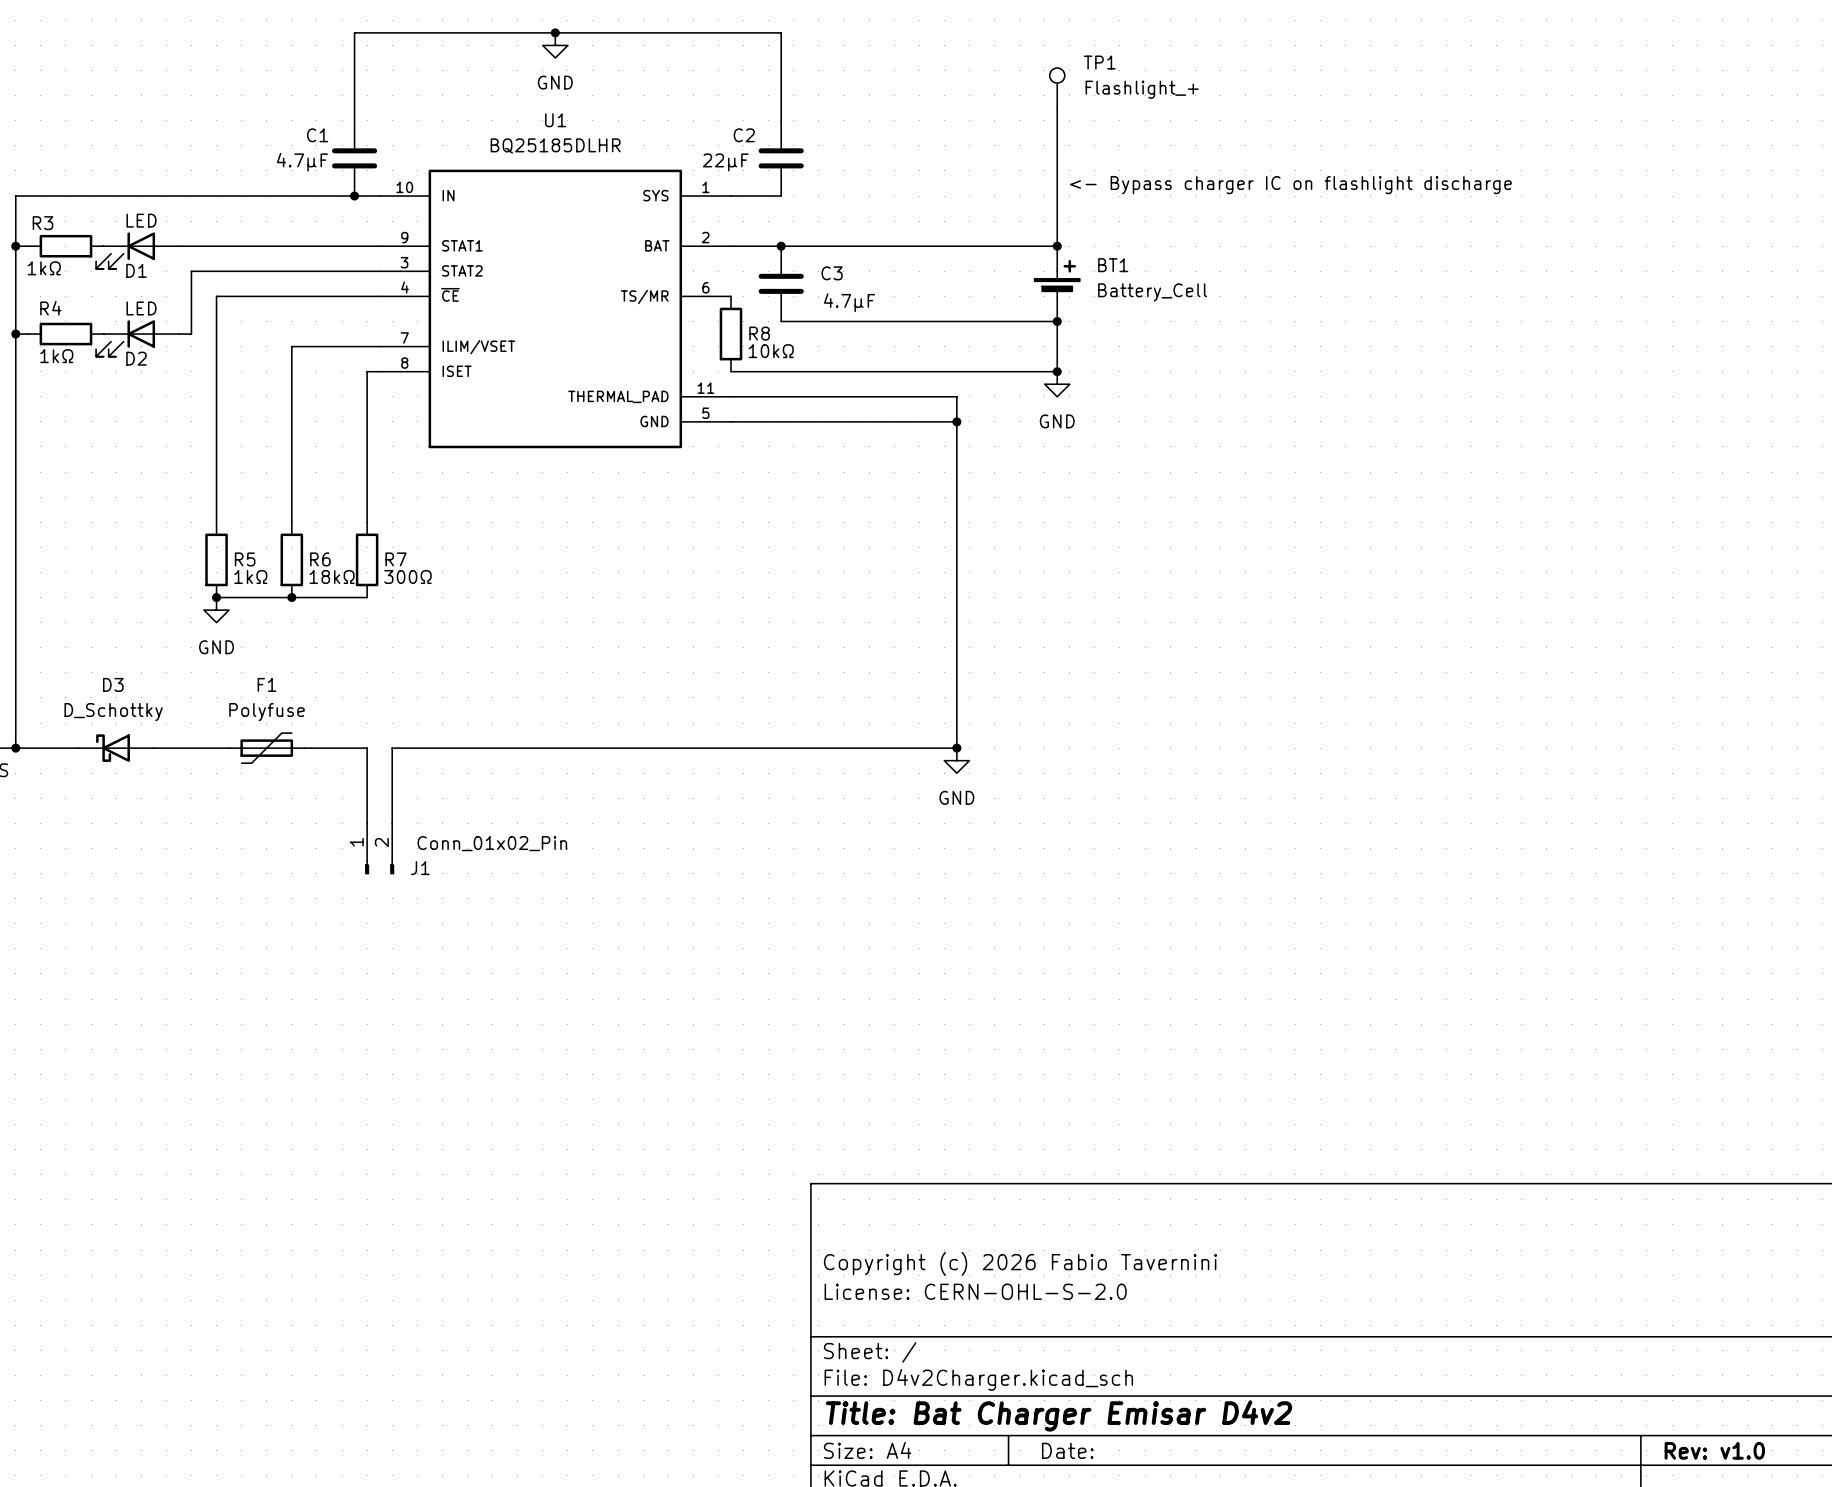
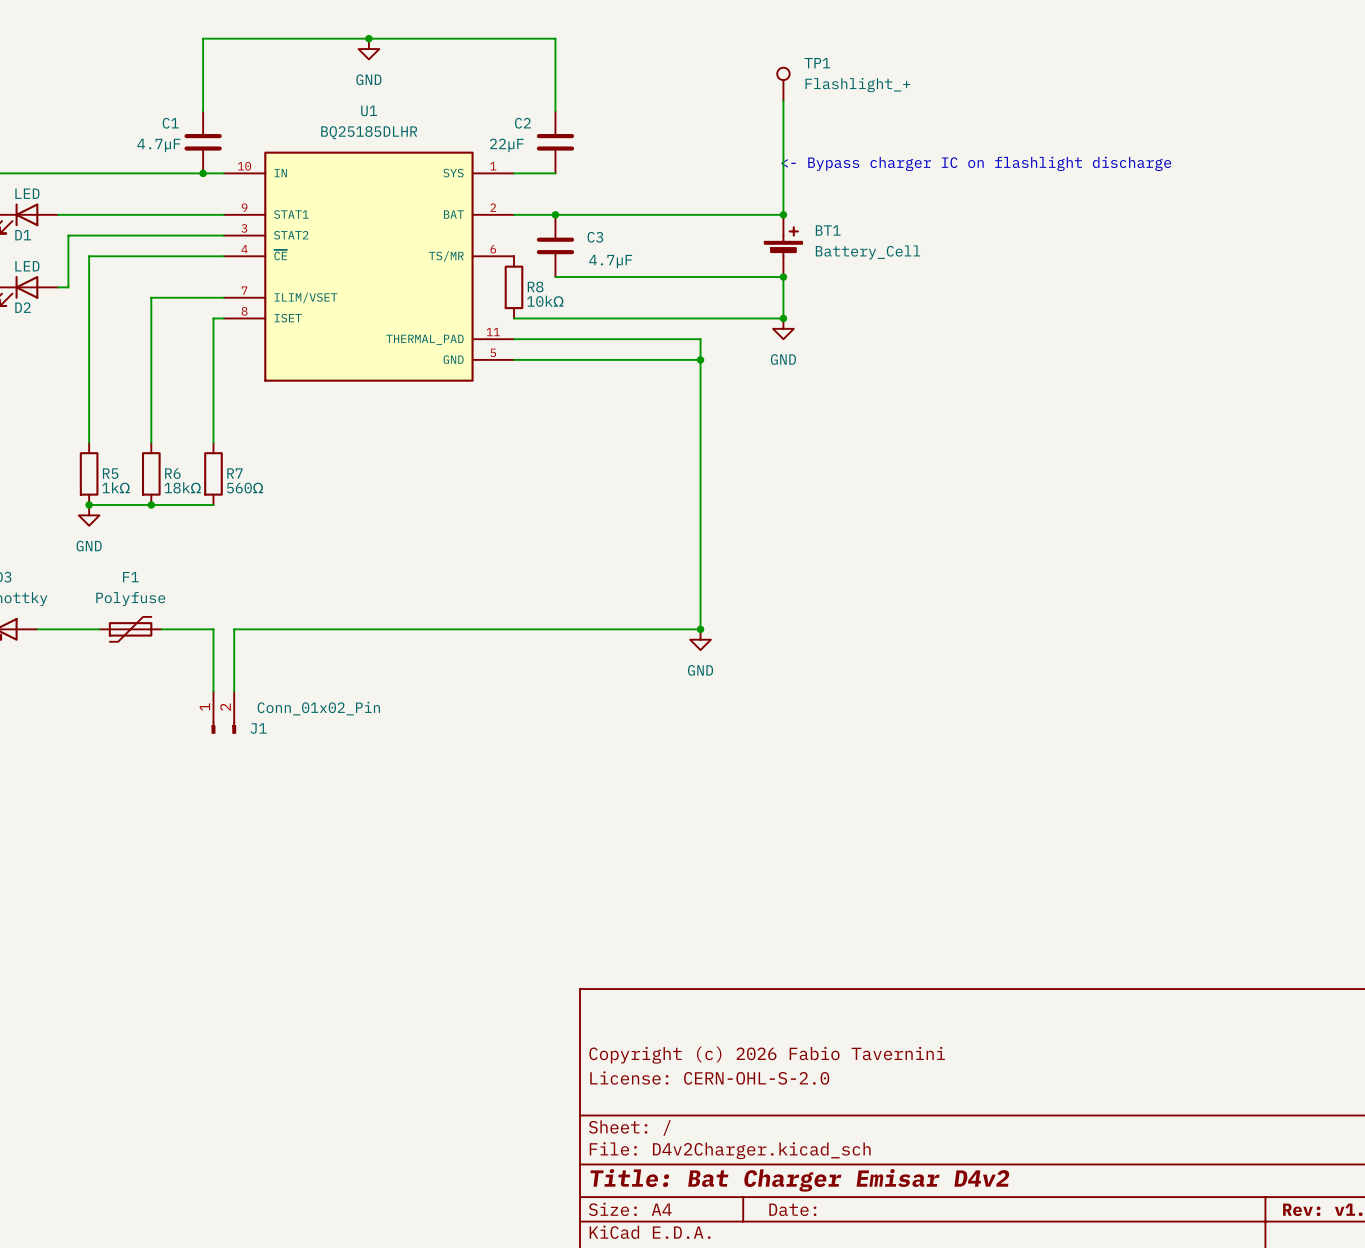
R7 value: 300Ω (407, 577) -> 560Ω (244, 488)

